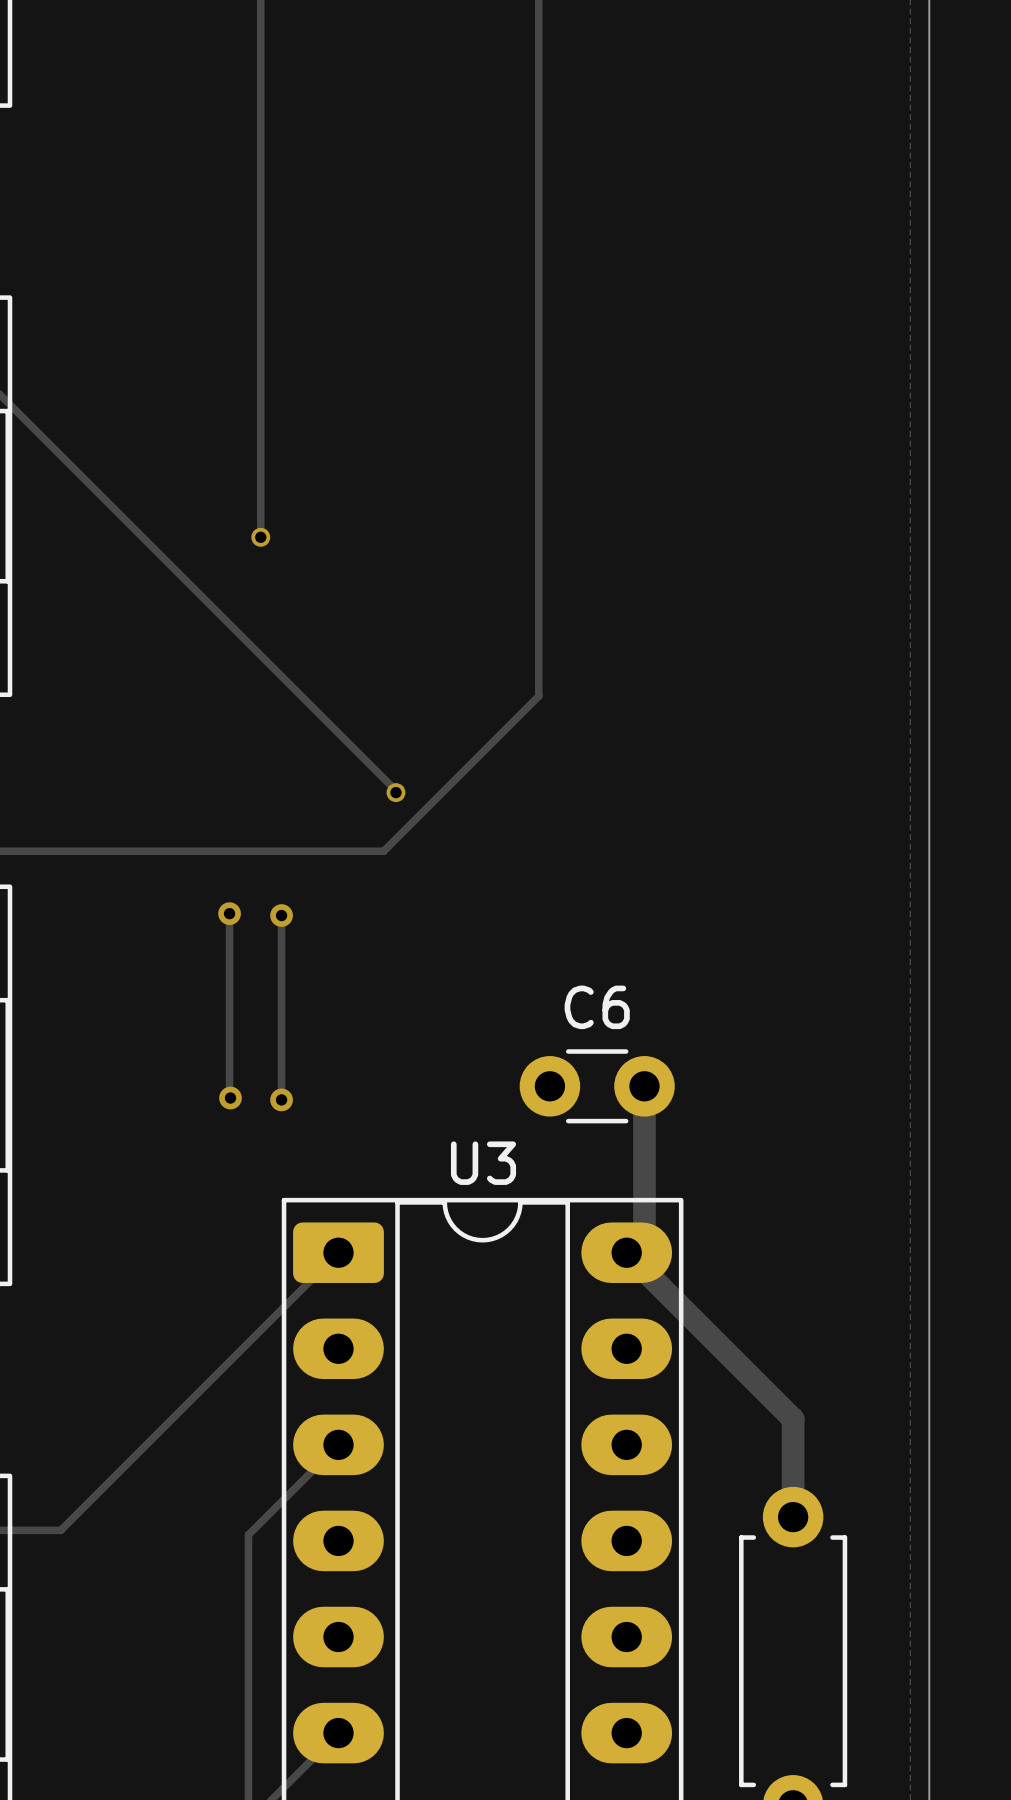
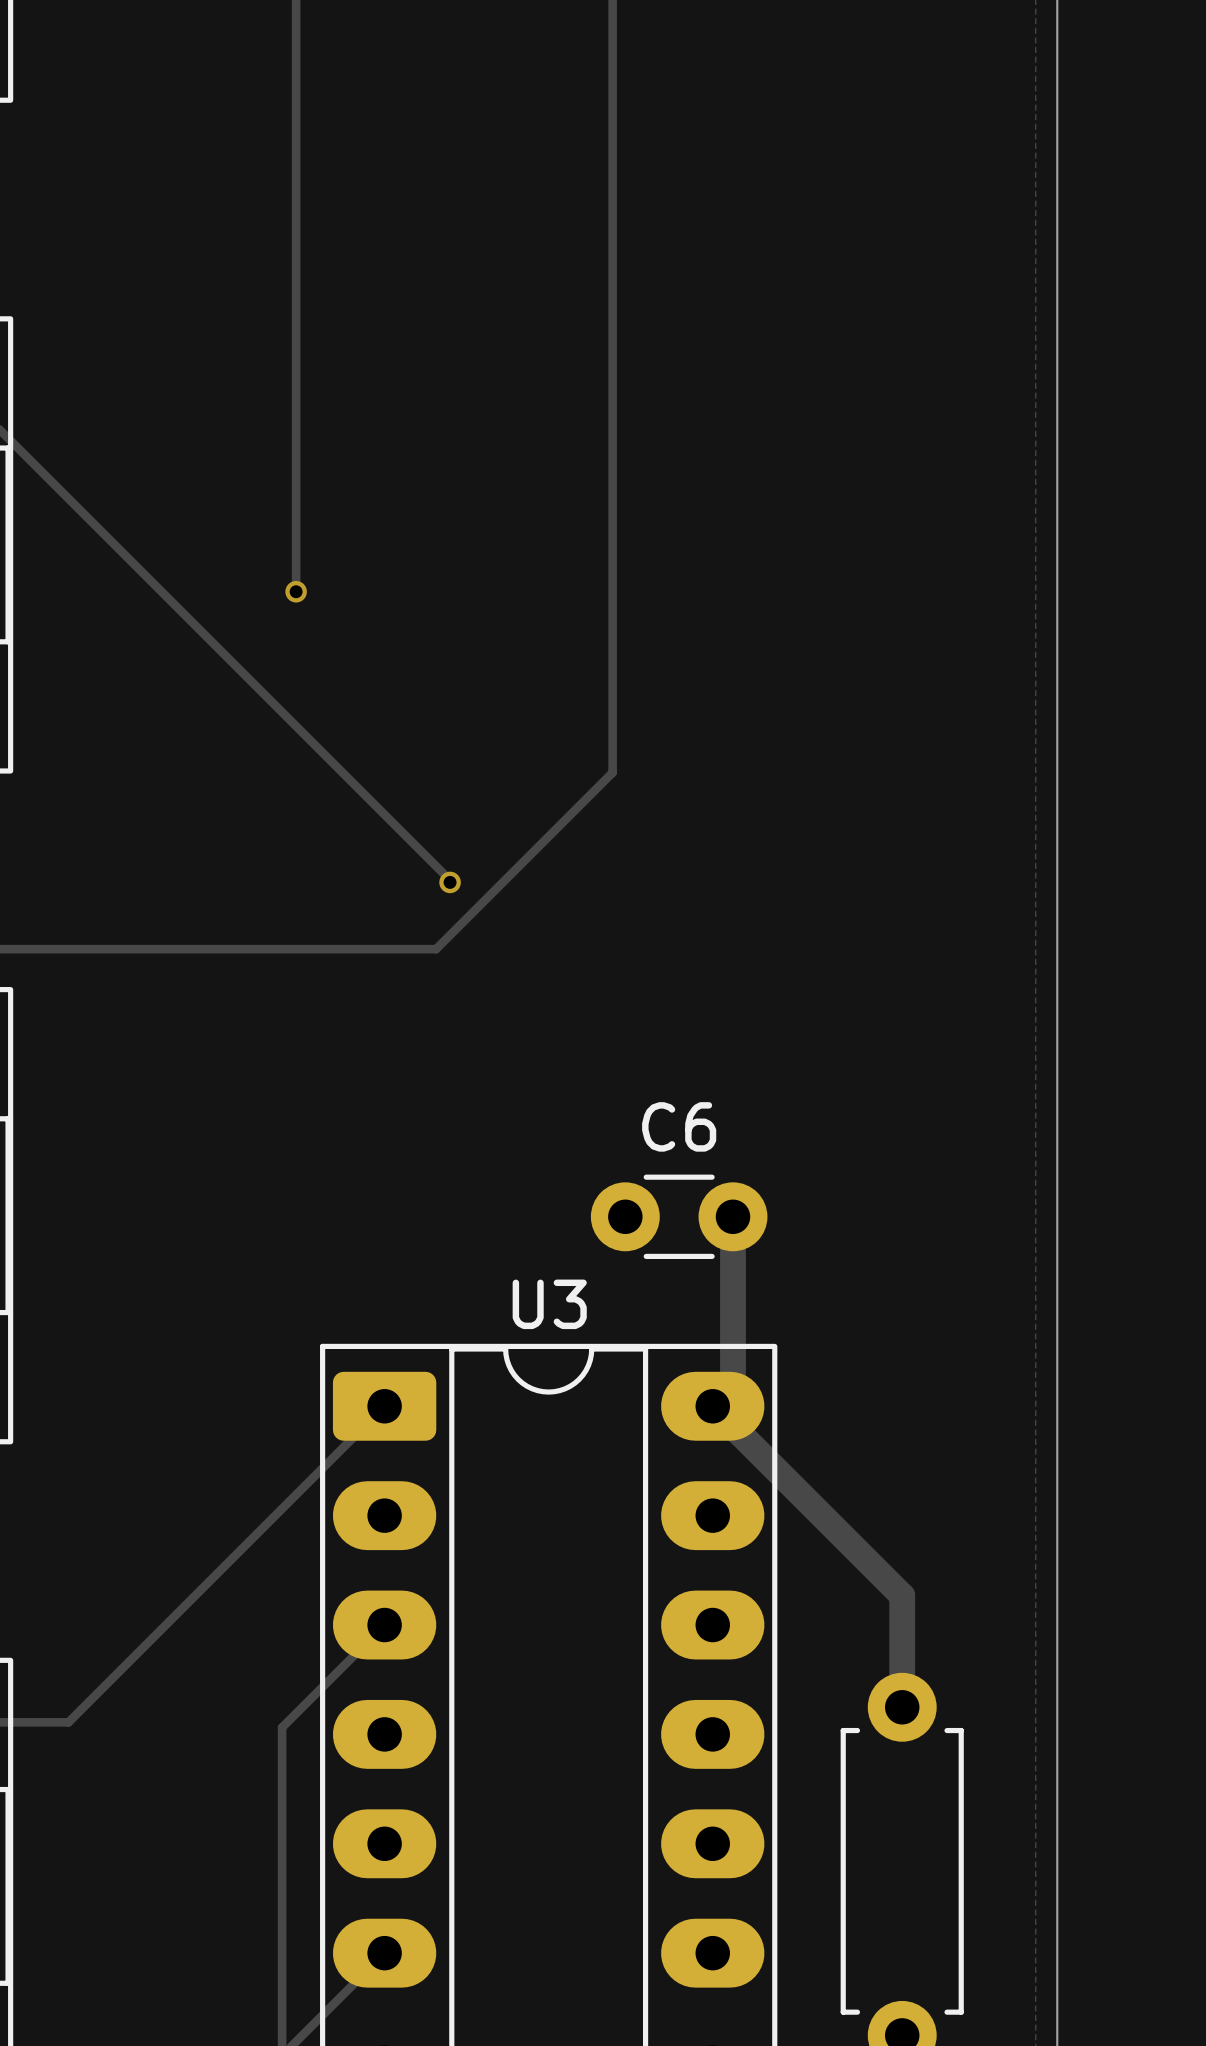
track: (229, 913) (230, 1098) -> none
via: (229, 913) -> none
track: (281, 915) (281, 1099) -> none
via: (281, 915) -> none
via: (230, 1098) -> none
via: (281, 1099) -> none

